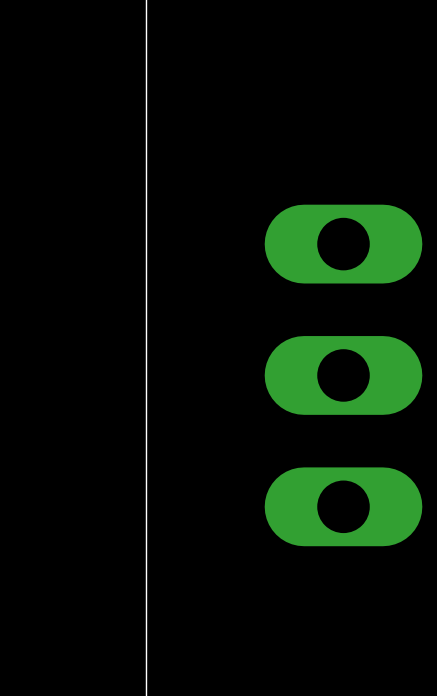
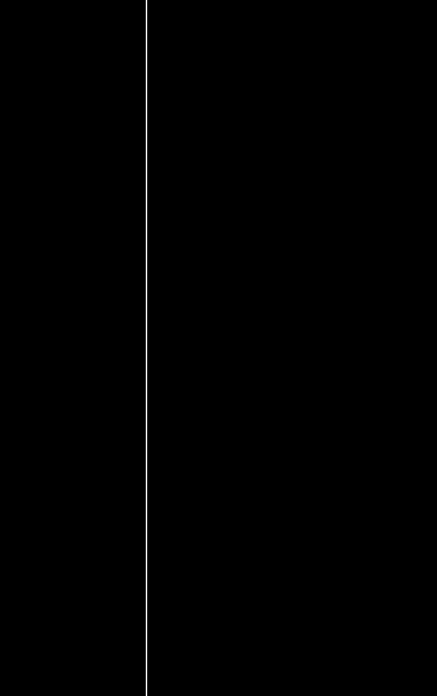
part: (343, 375) -> none

